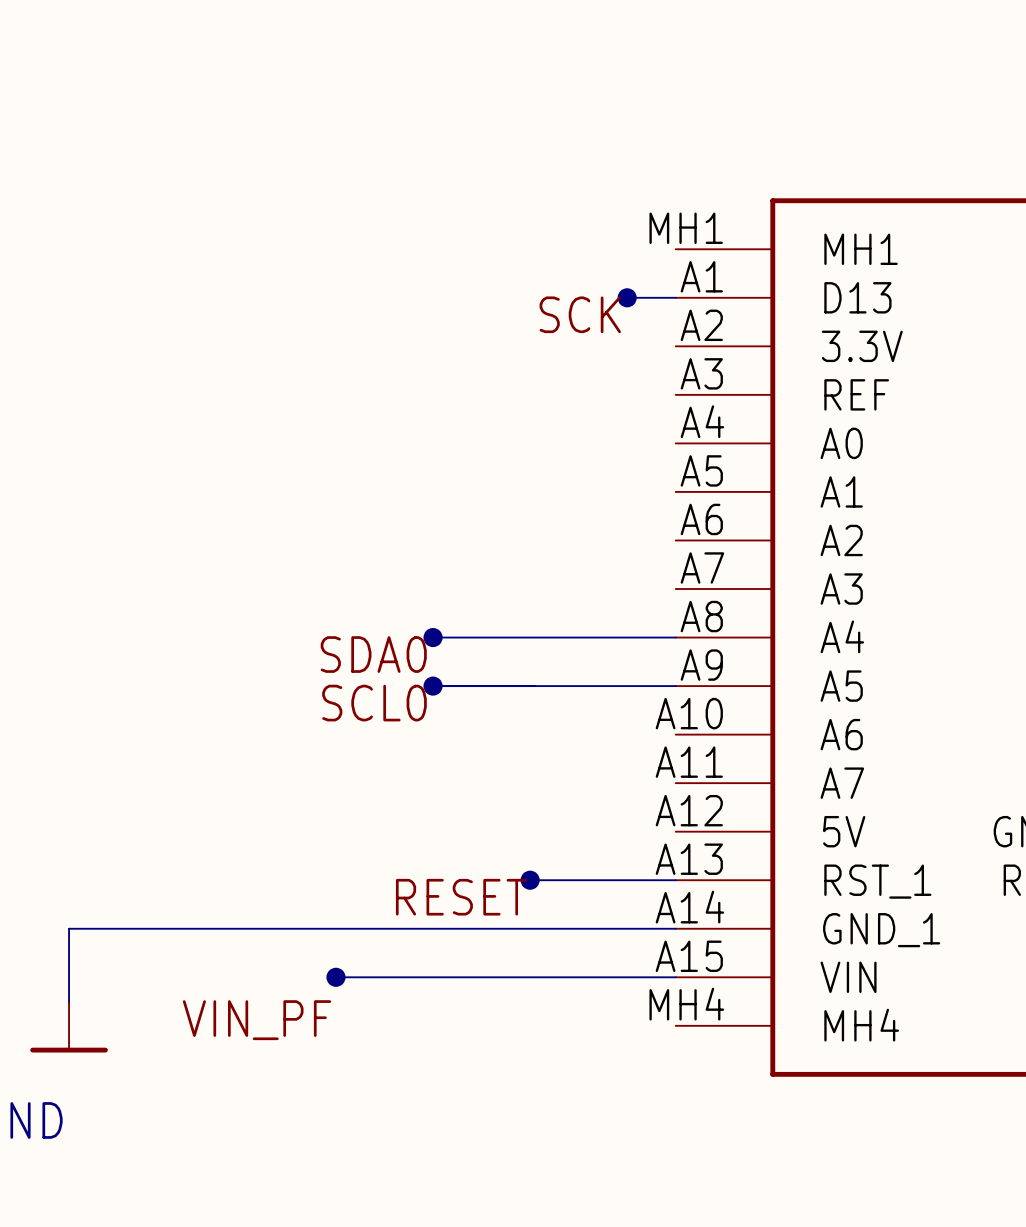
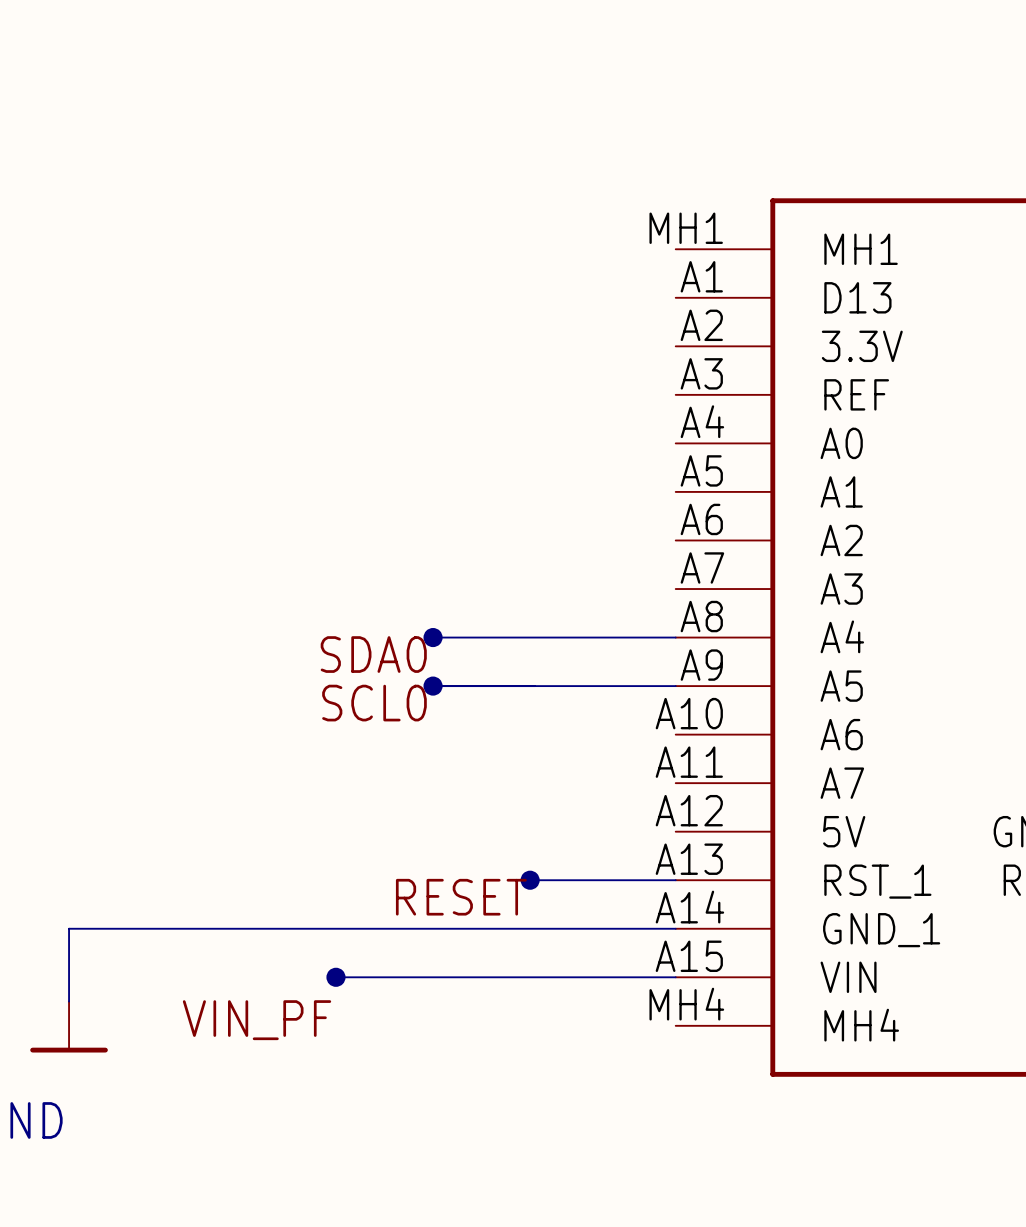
wire: (627, 297) (675, 297) -> none
junction: (627, 297) -> none
label: SCK (580, 314) -> none

